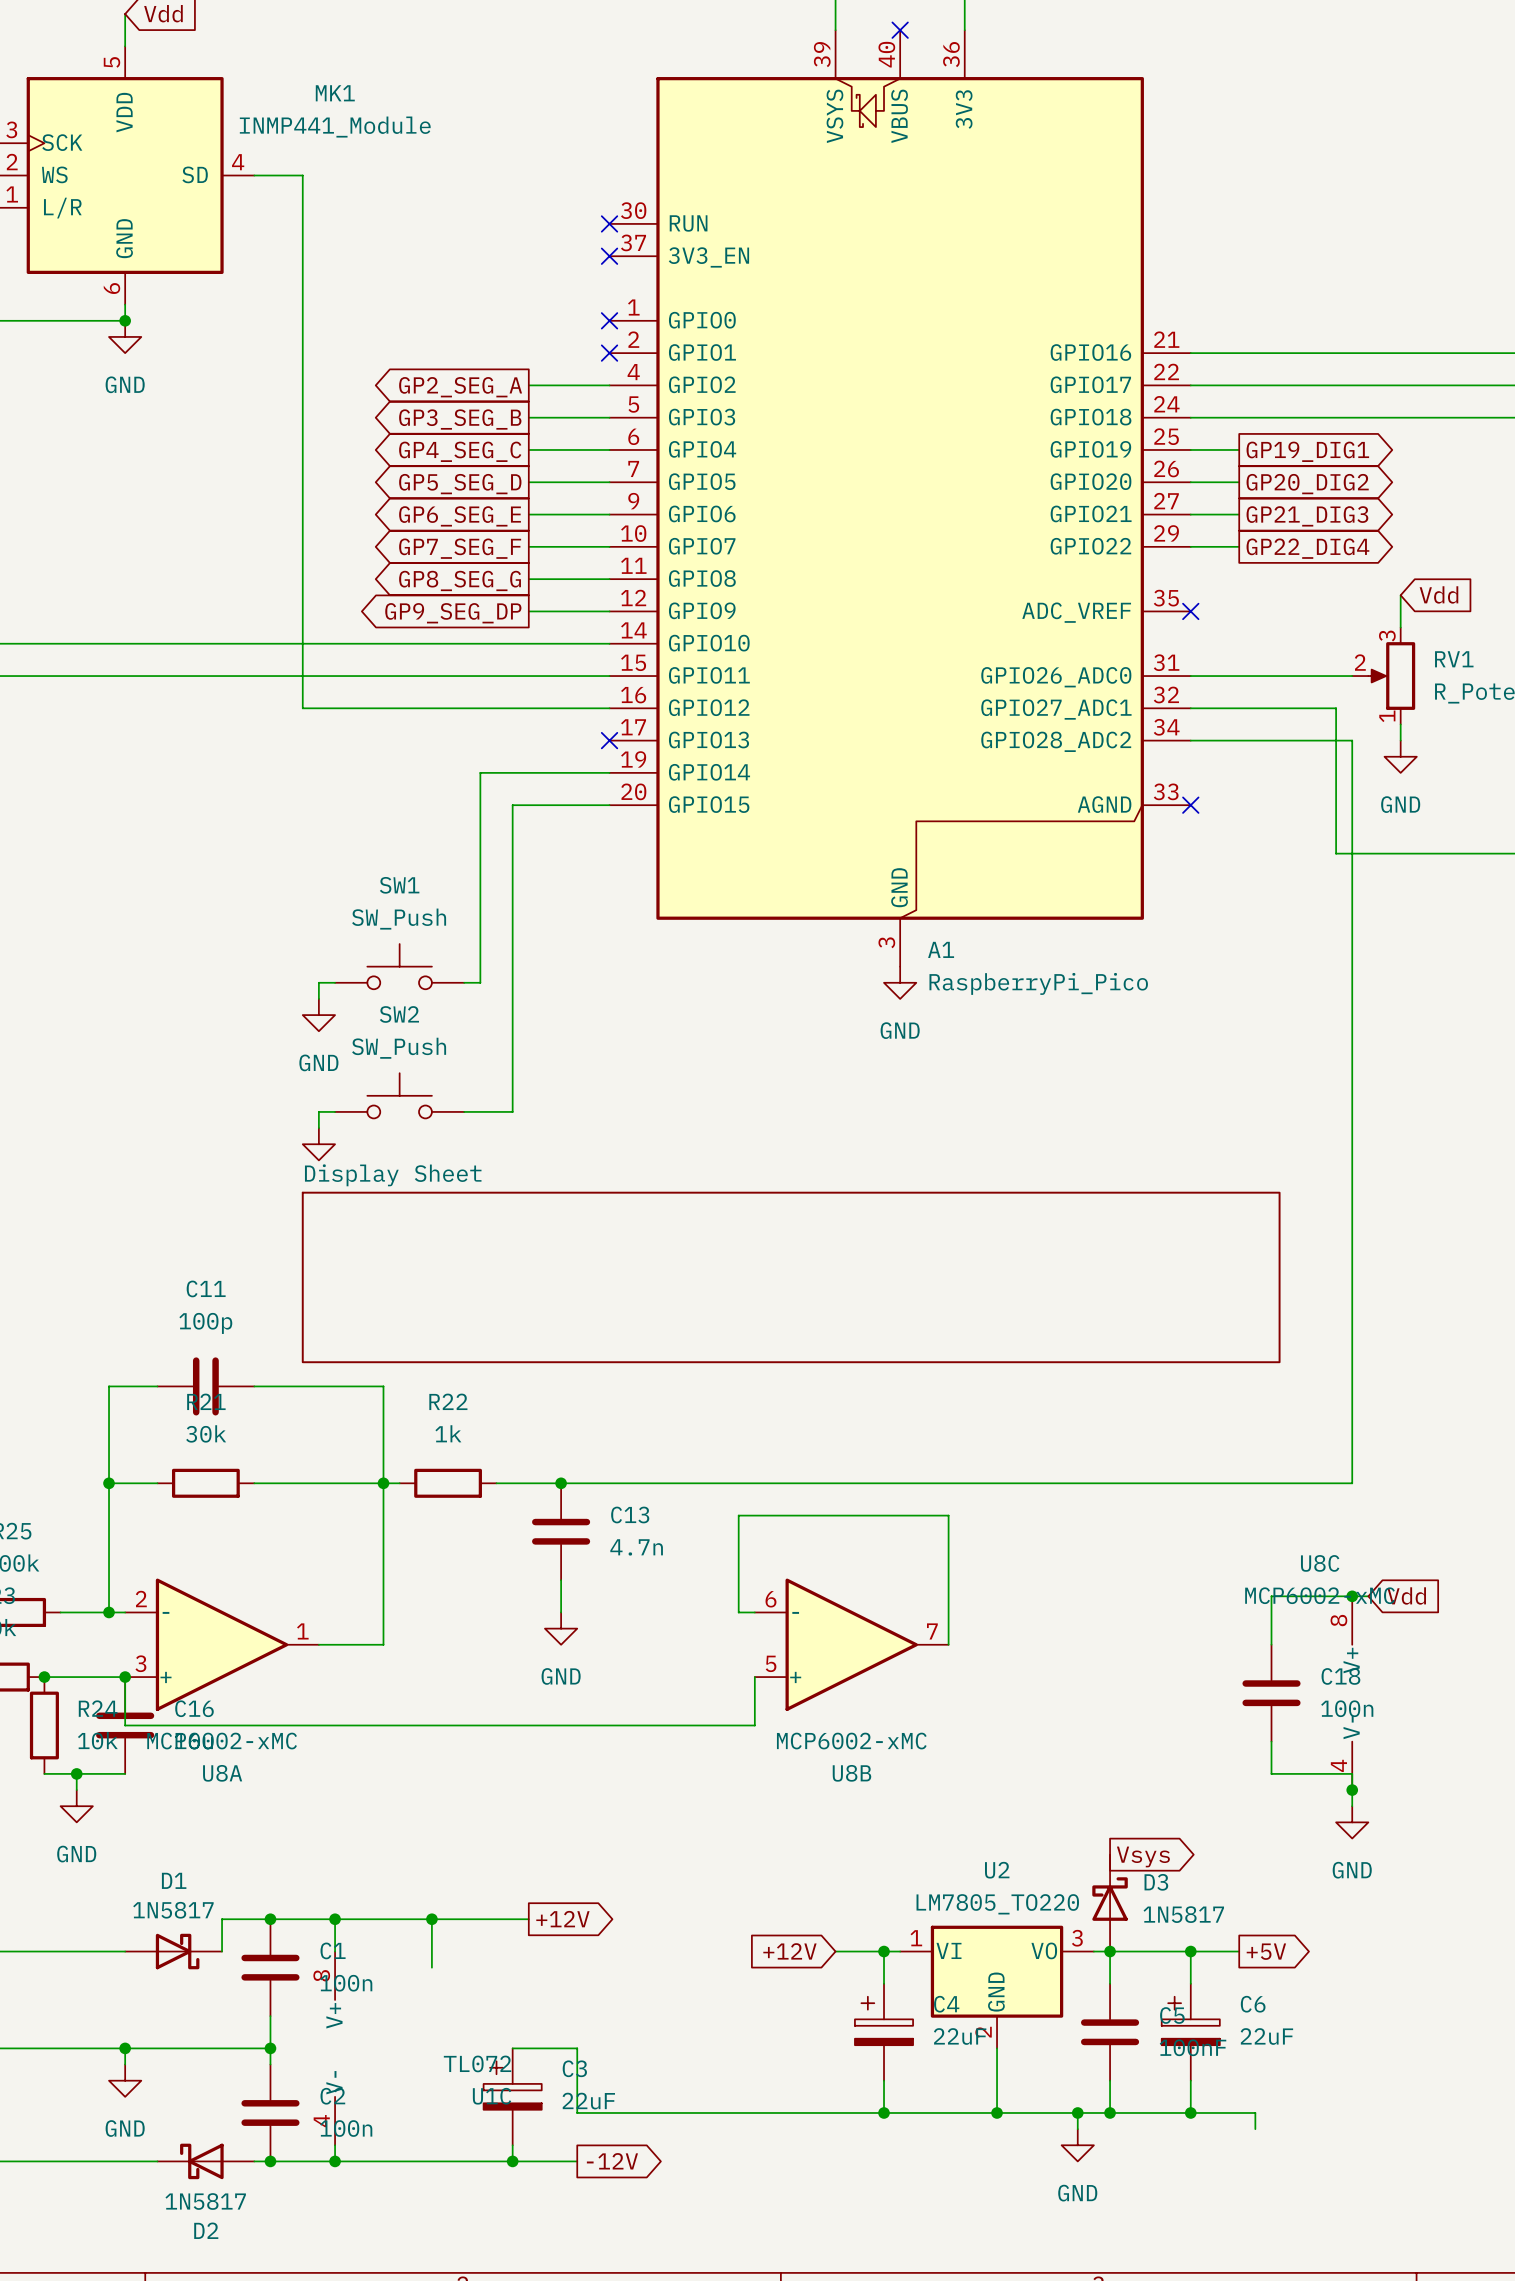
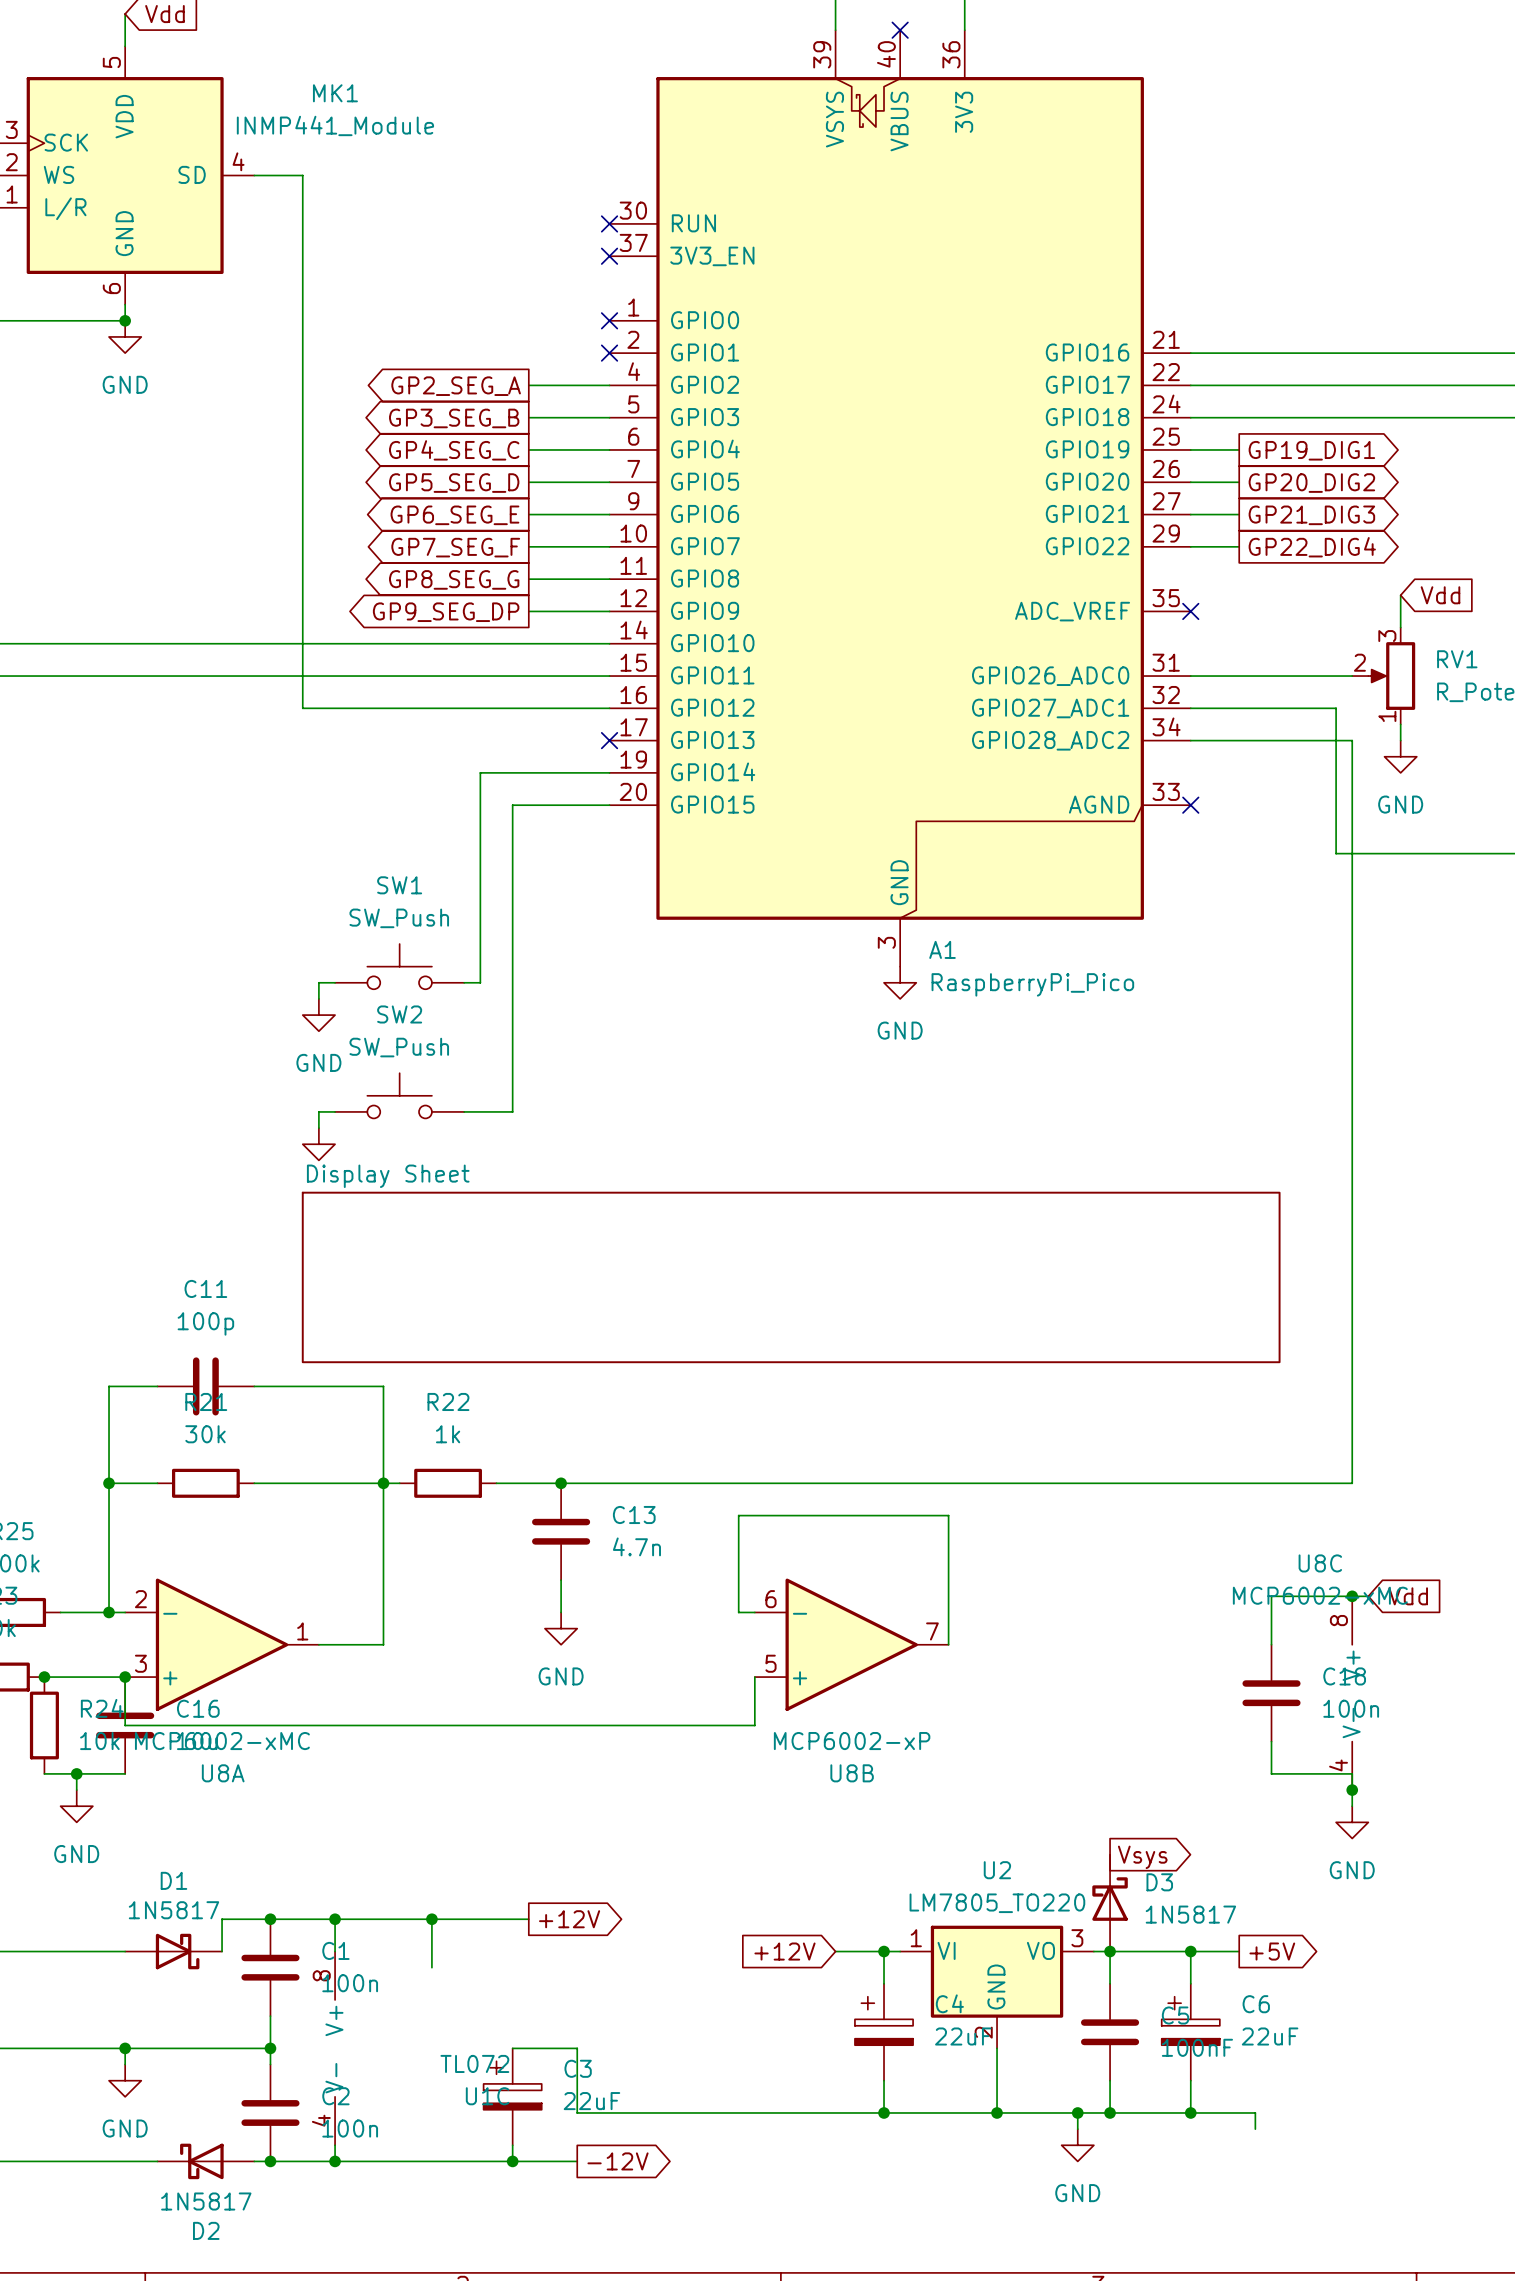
U8B value: MCP6002-xMC (851, 1741) -> MCP6002-xP (852, 1741)

